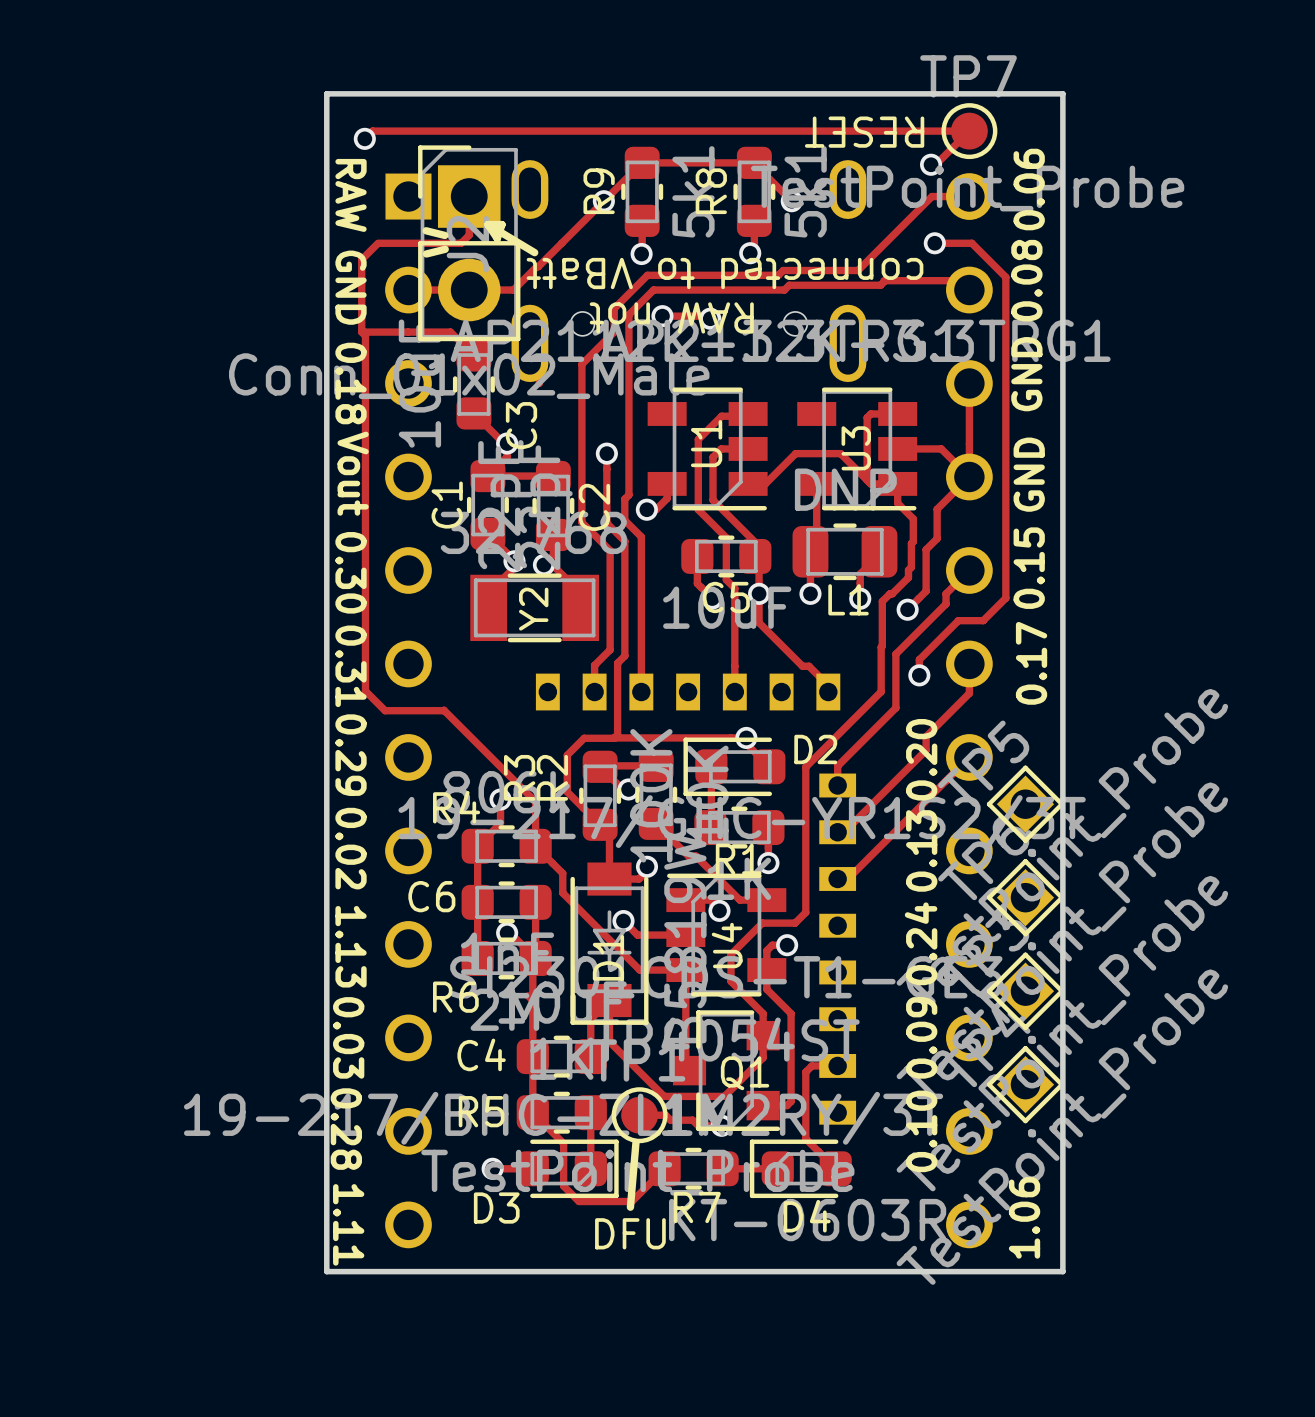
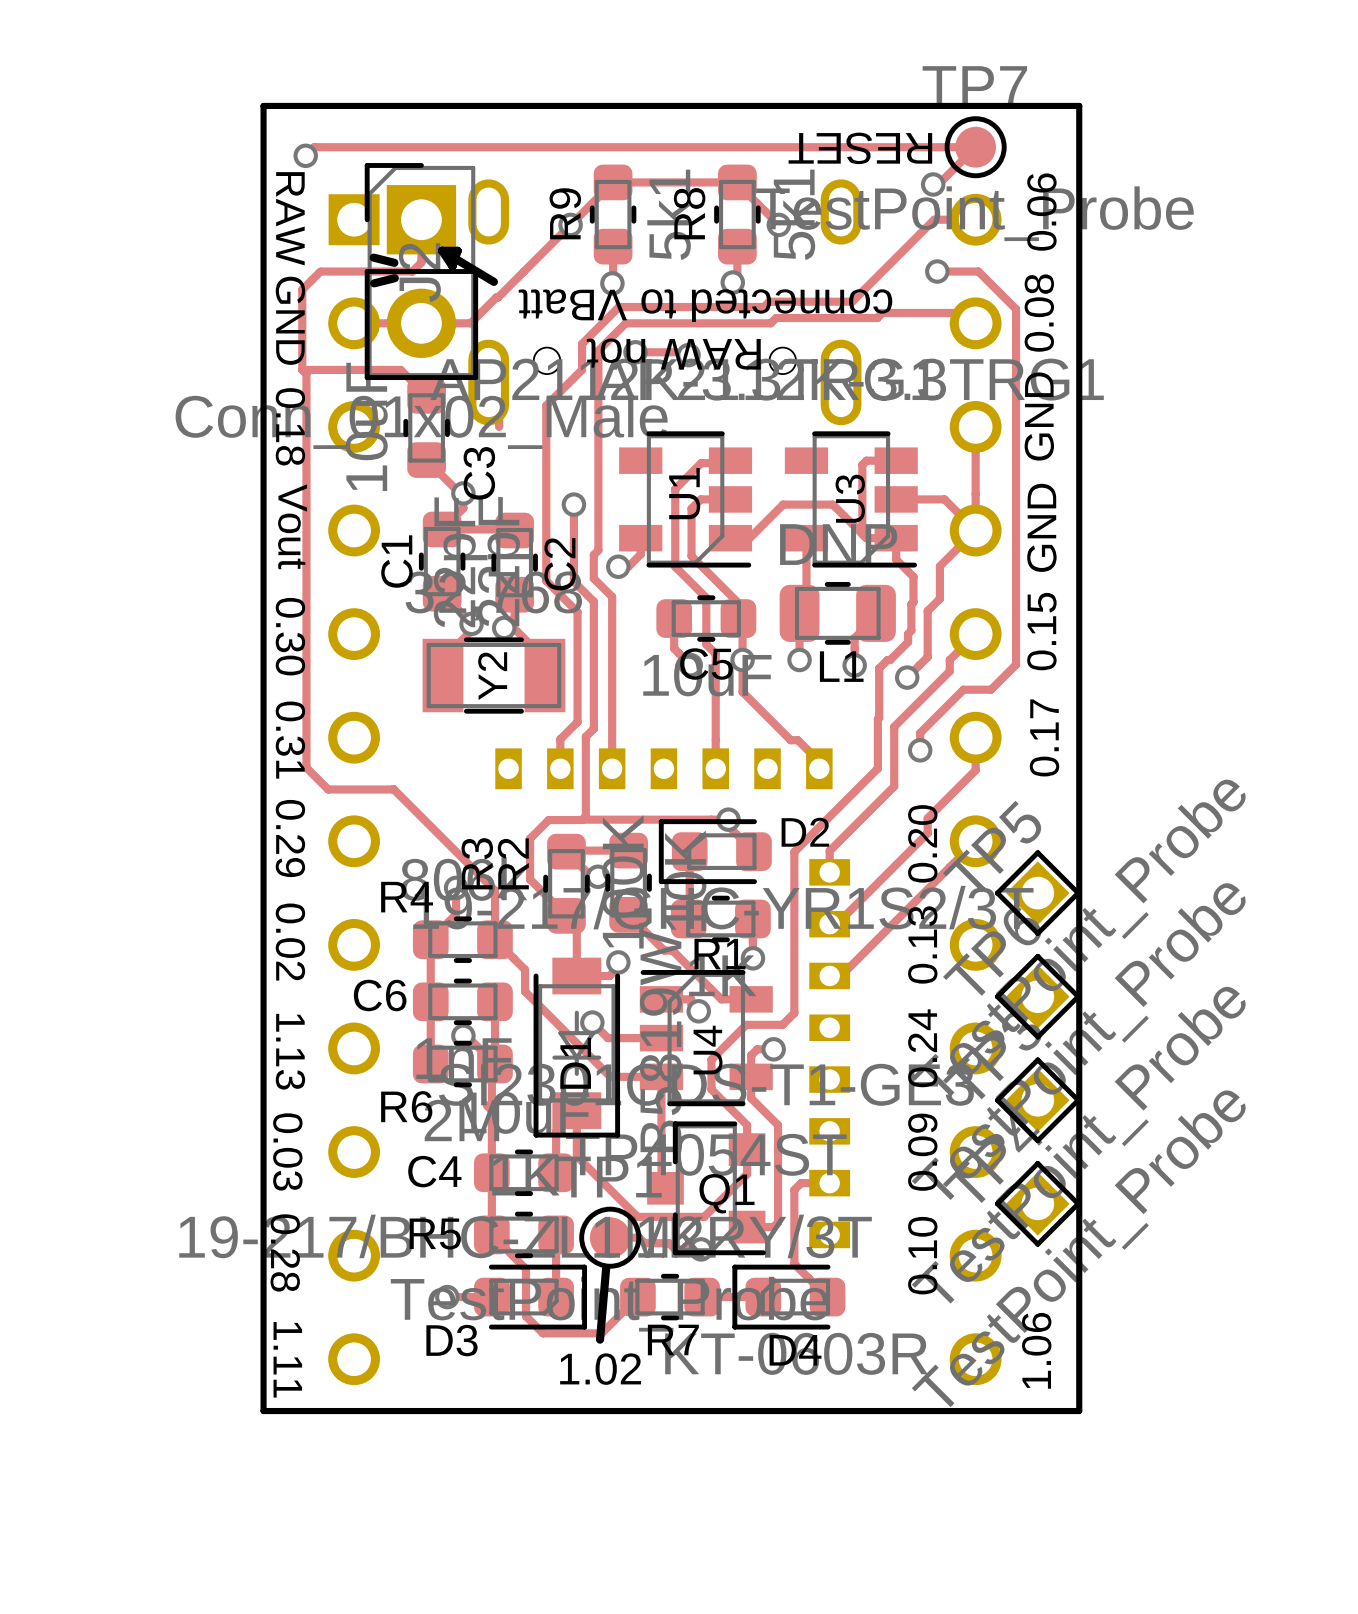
text: DFU (630, 1233) -> 1.02 (600, 1369)

